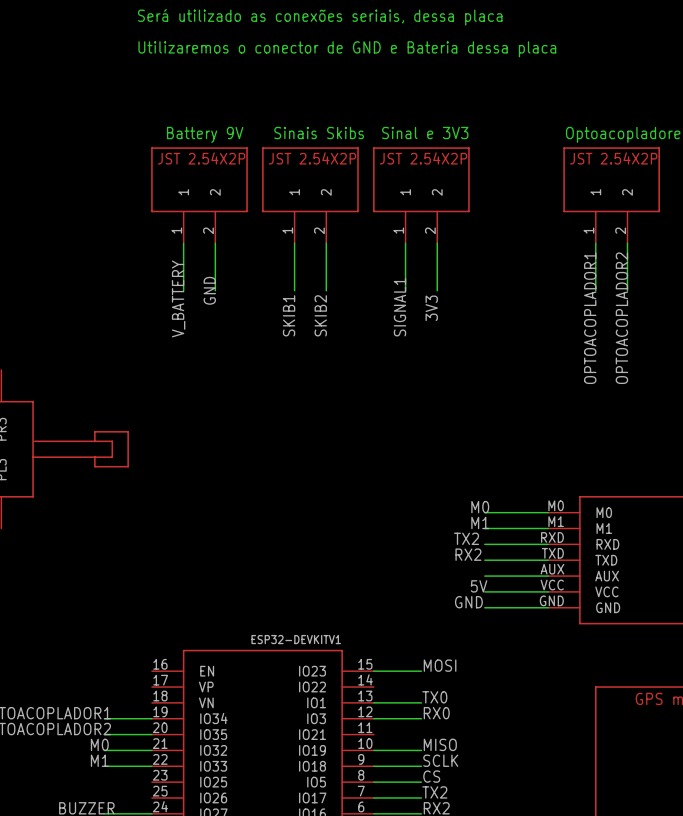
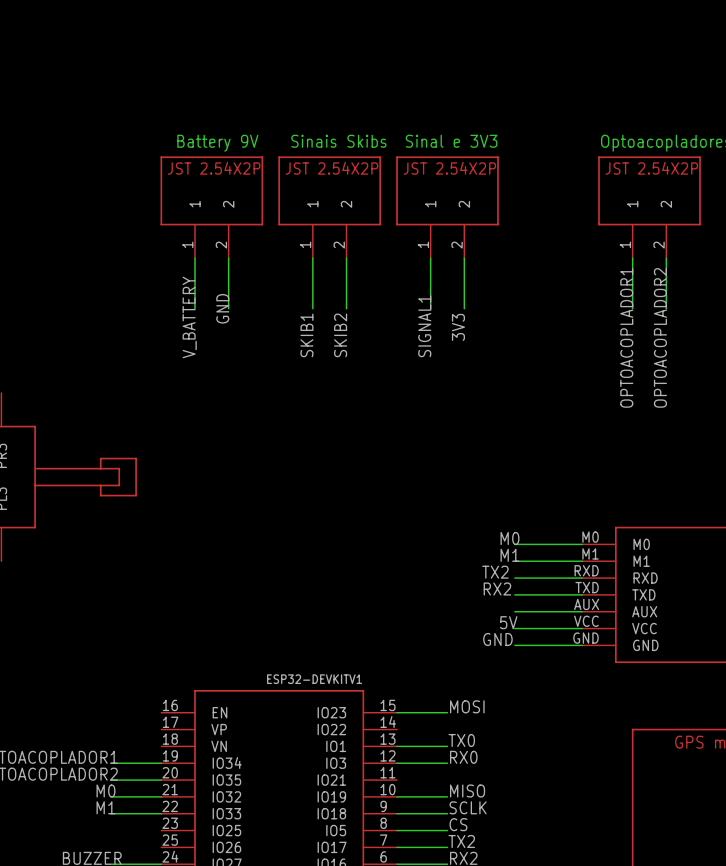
text: Será utilizado as conexões seriais, dessa placa (320, 17) -> none
text: Utilizaremos o conector de GND e Bateria dessa placa (347, 49) -> none

